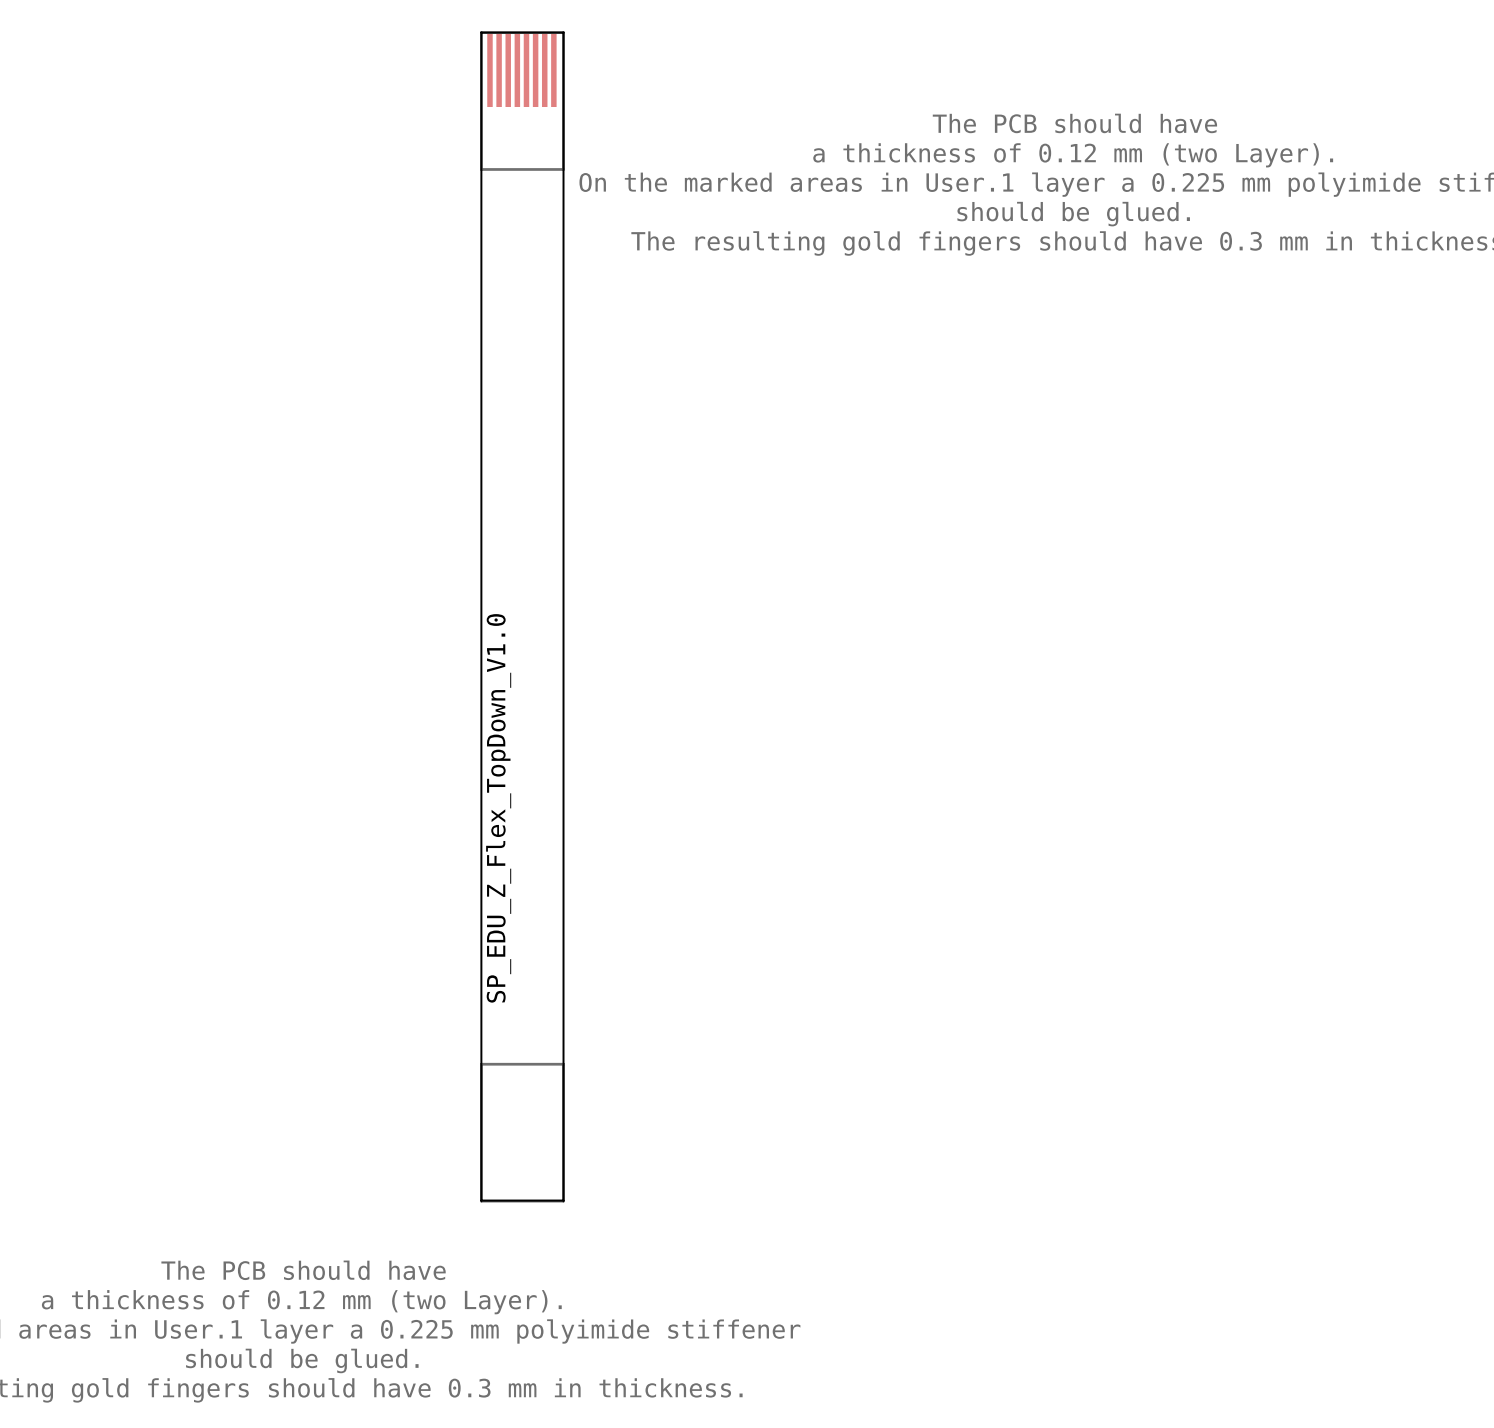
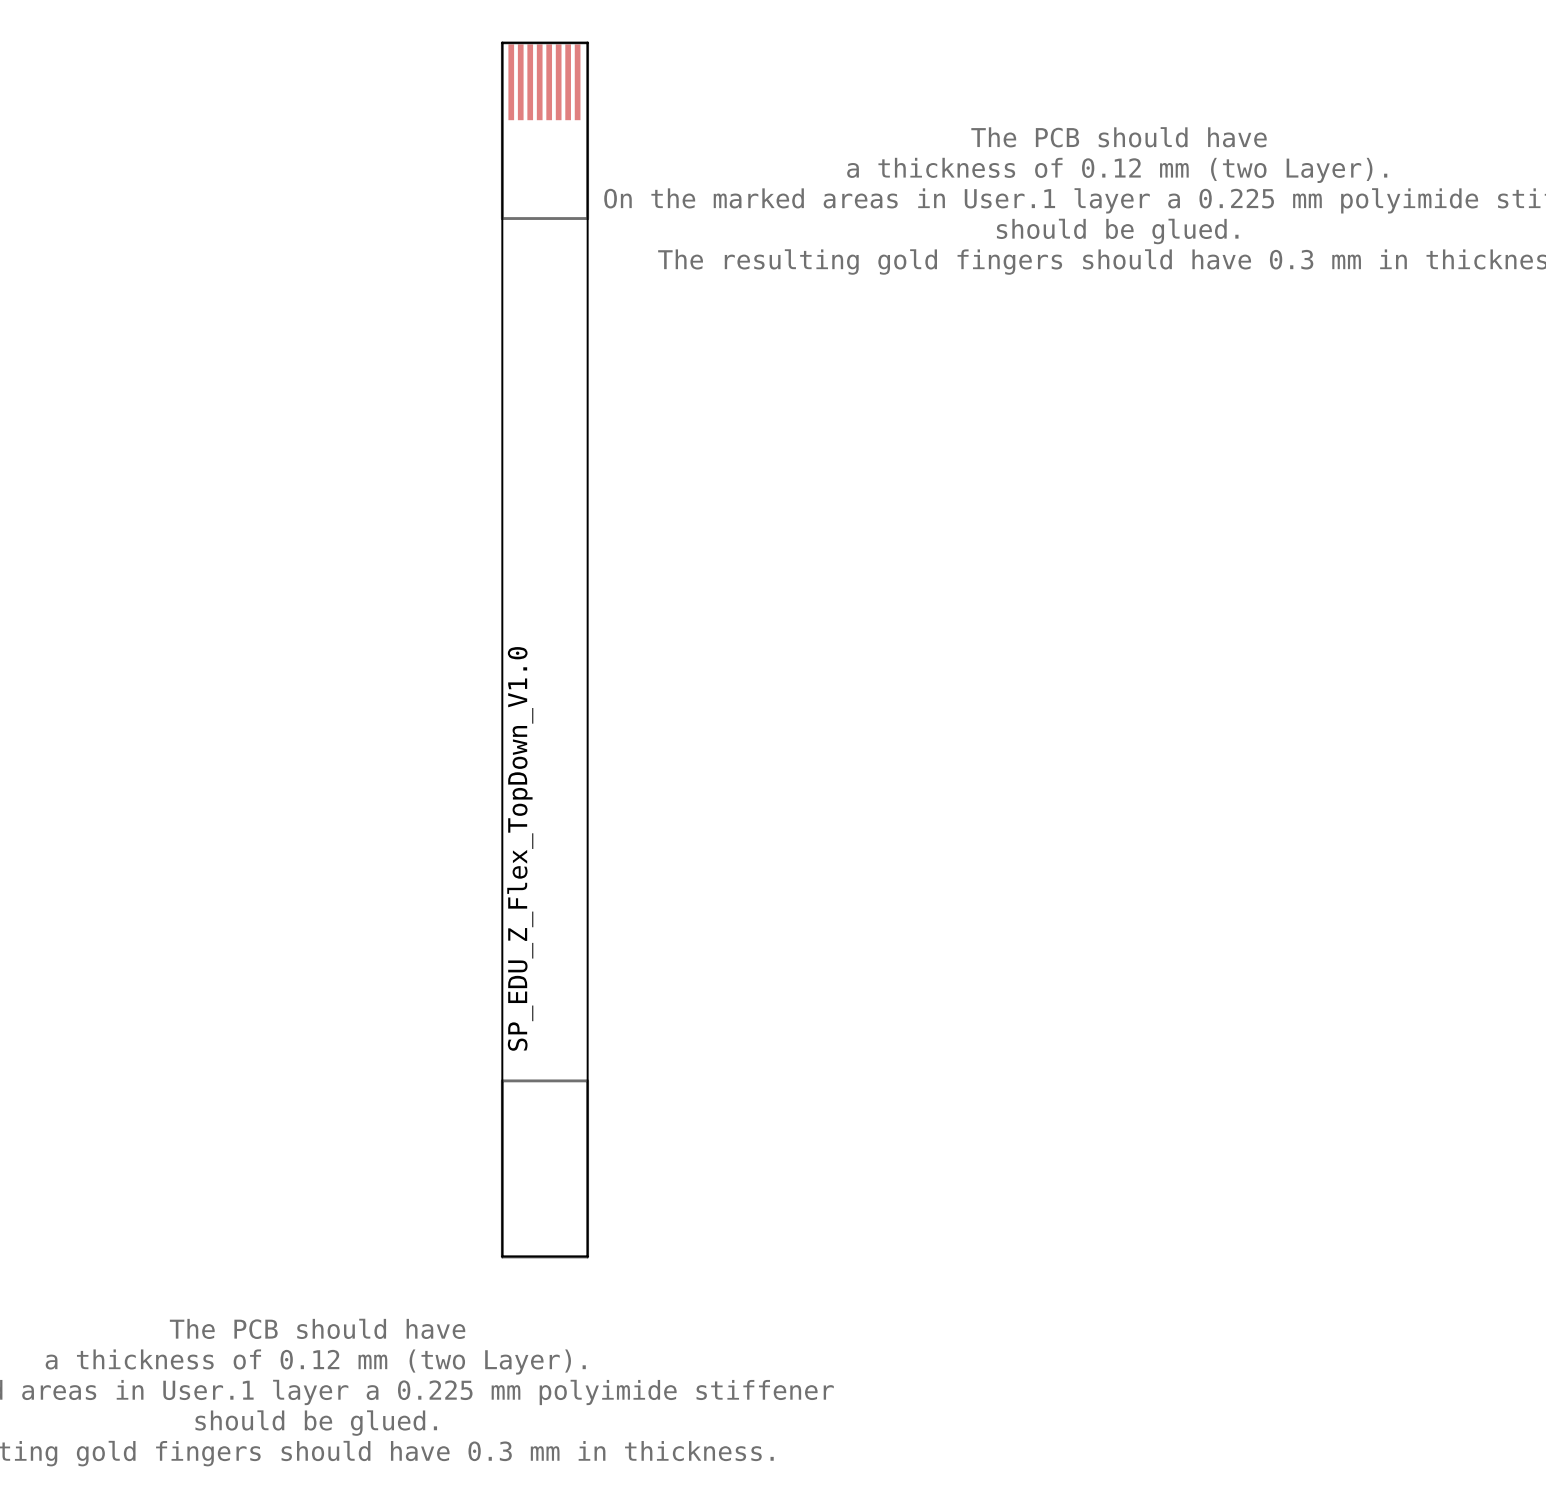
line: (481, 169) (563, 169) -> (502, 185) (502, 218) (587, 218) (587, 185)
line: (481, 1064) (563, 1064) -> (502, 1114) (502, 1080) (587, 1080) (587, 1114)

